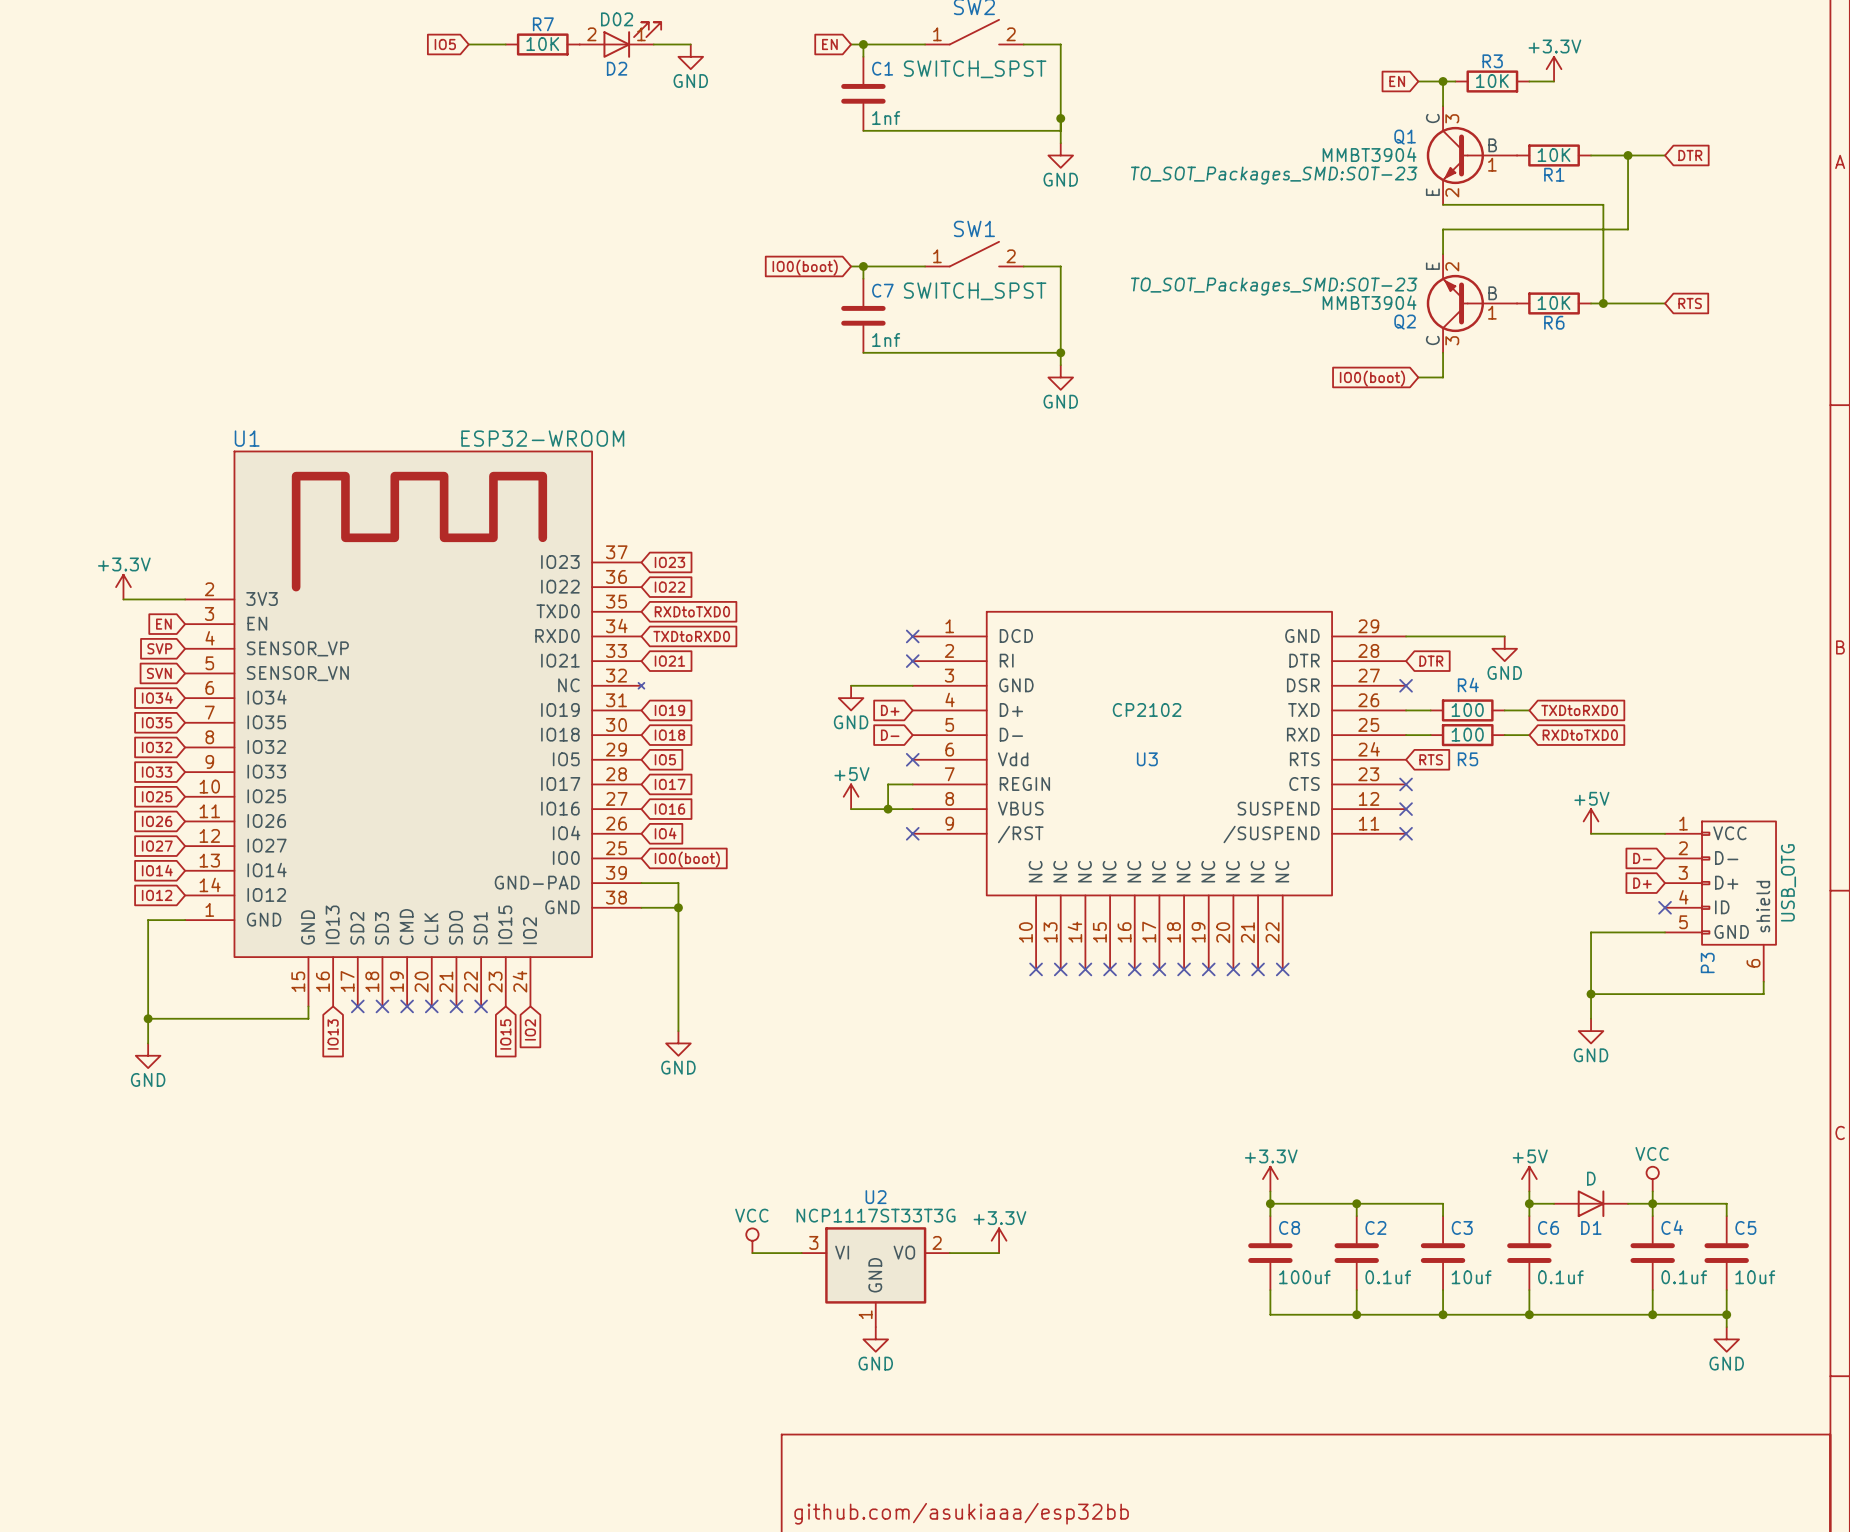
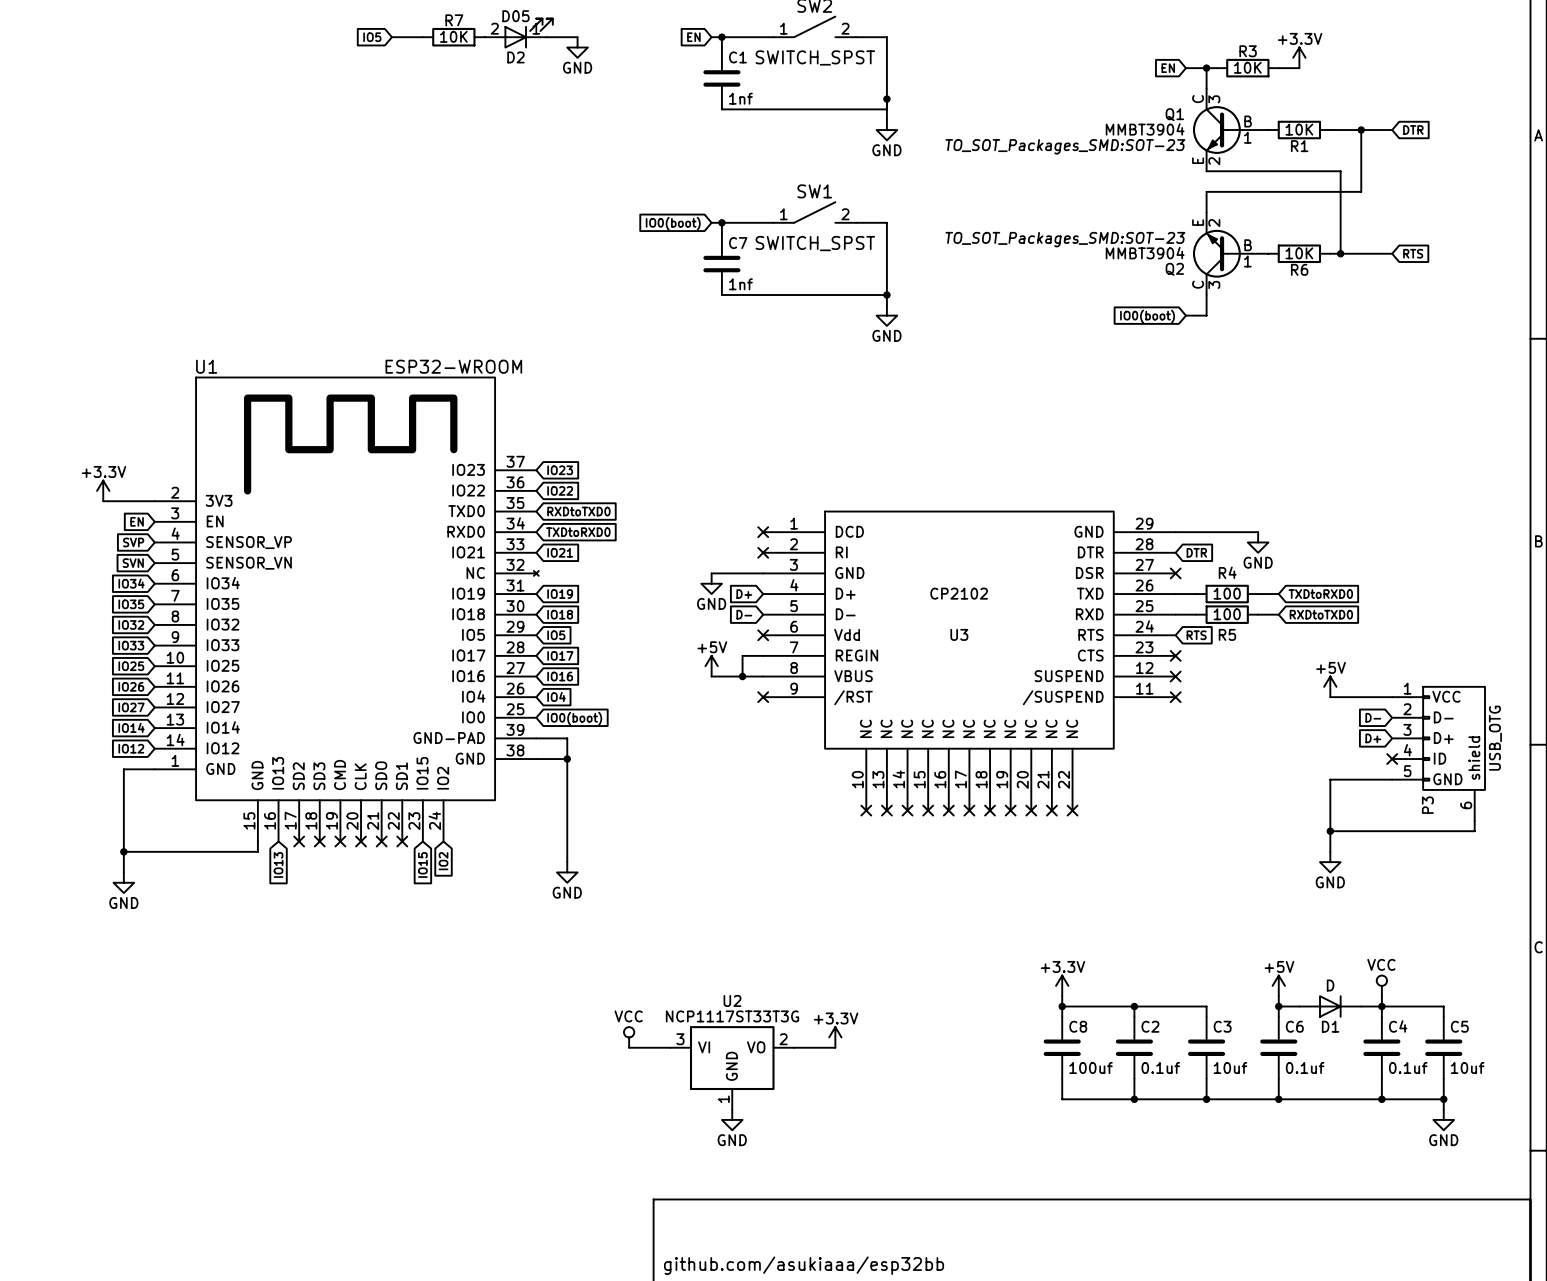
D2 value: D02 (617, 19) -> D05 (515, 16)

